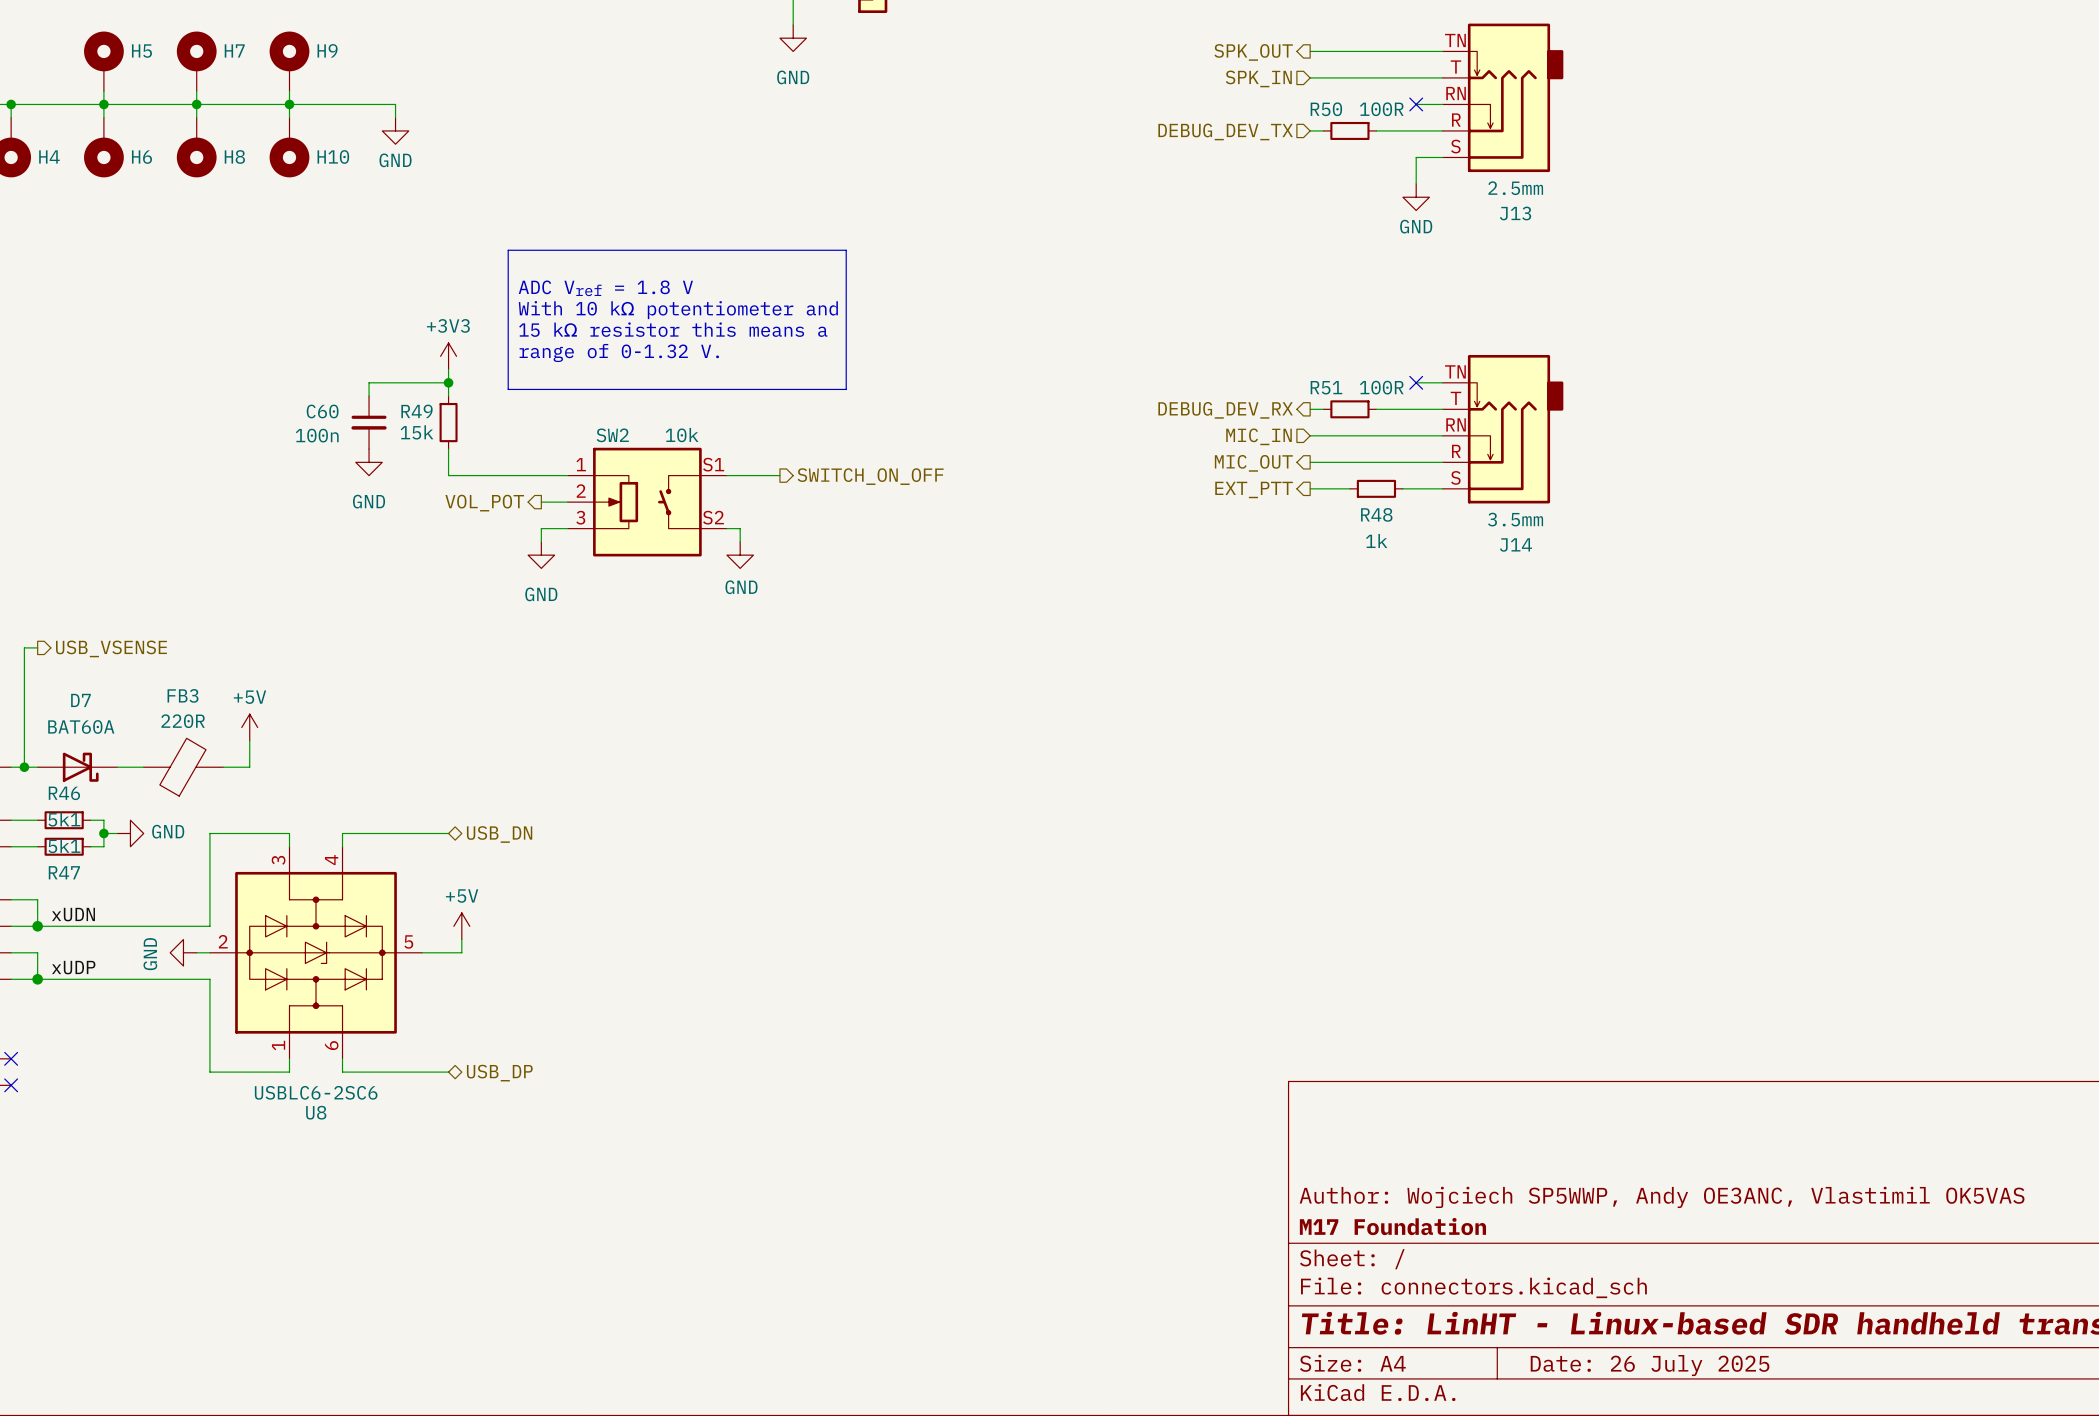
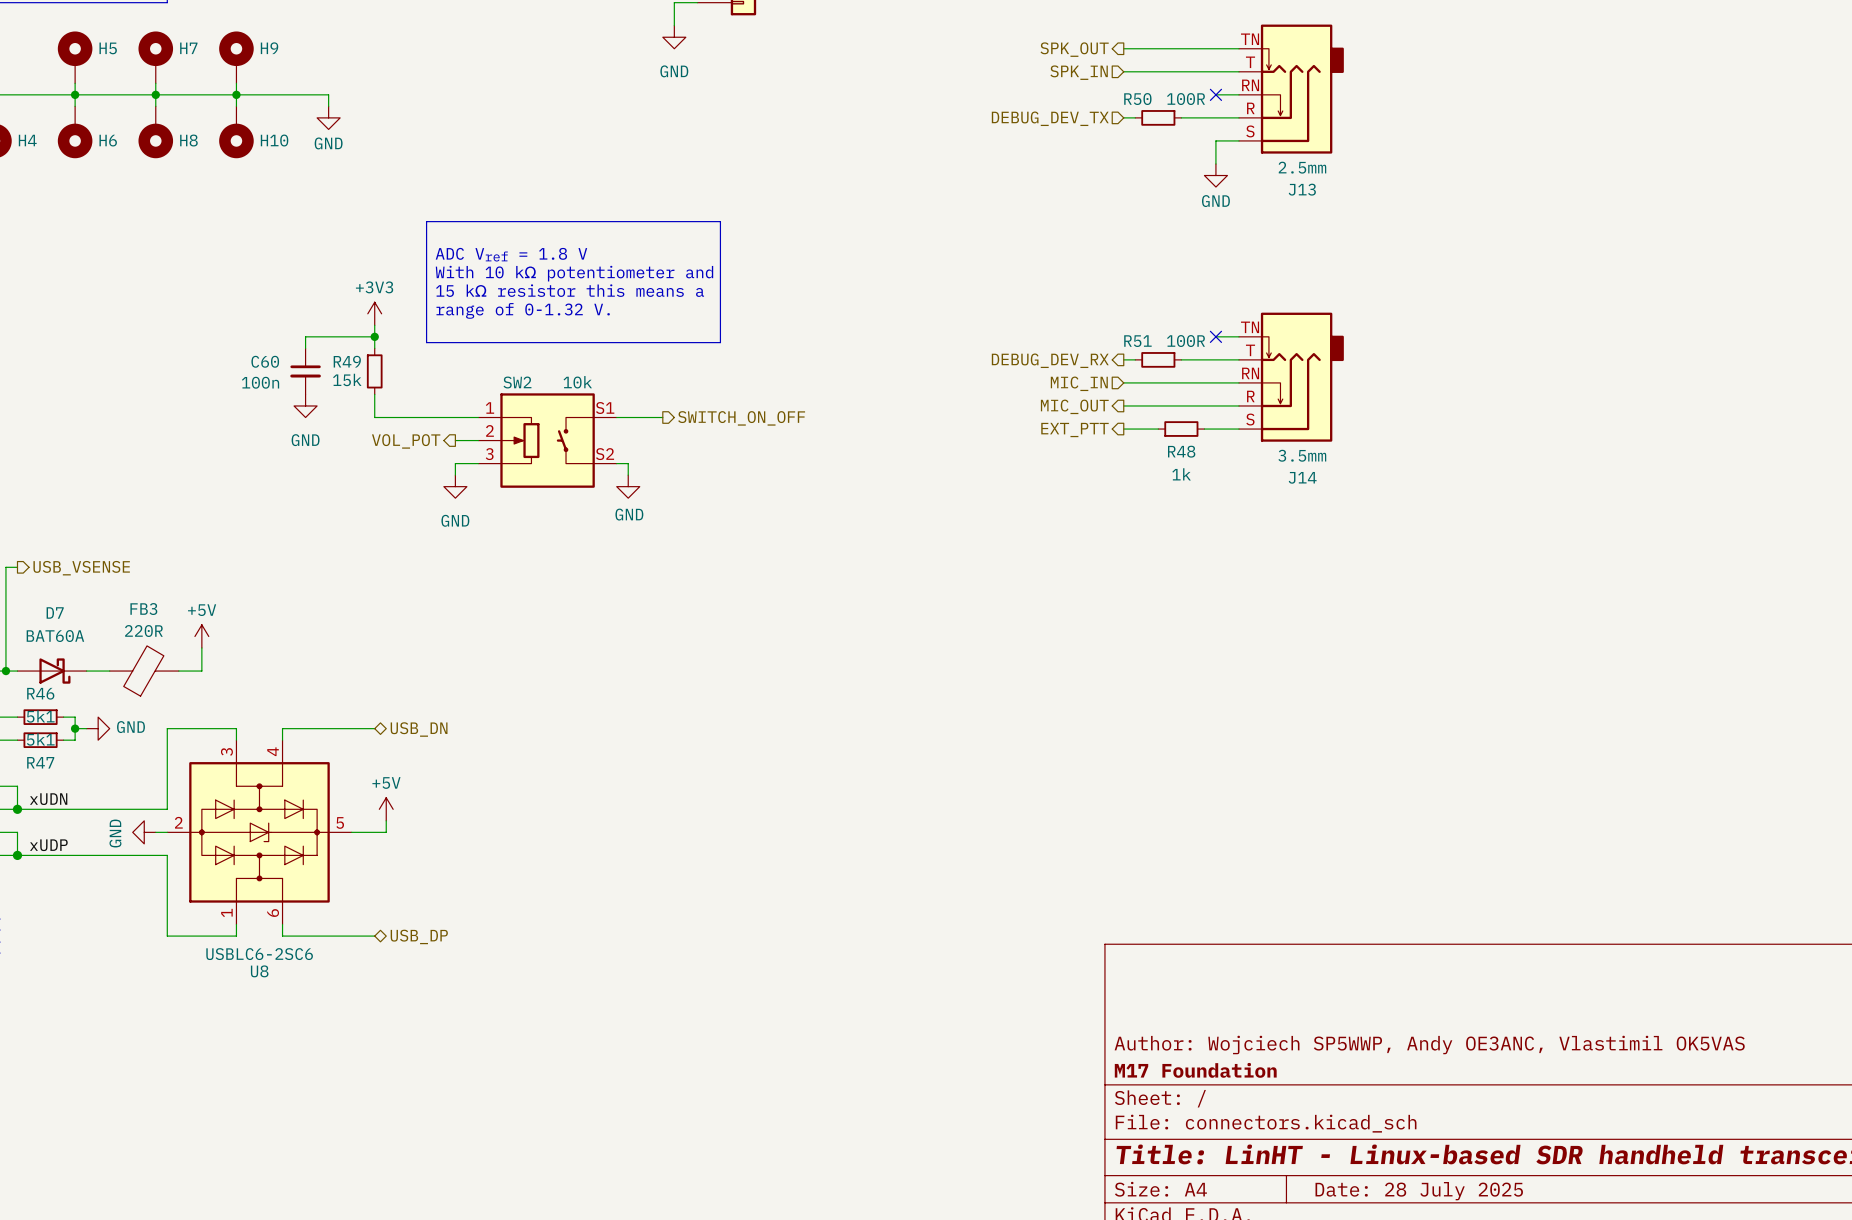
title block: Date: 26 July 2025 (1650, 1365) -> Date: 28 July 2025 (1419, 1191)

